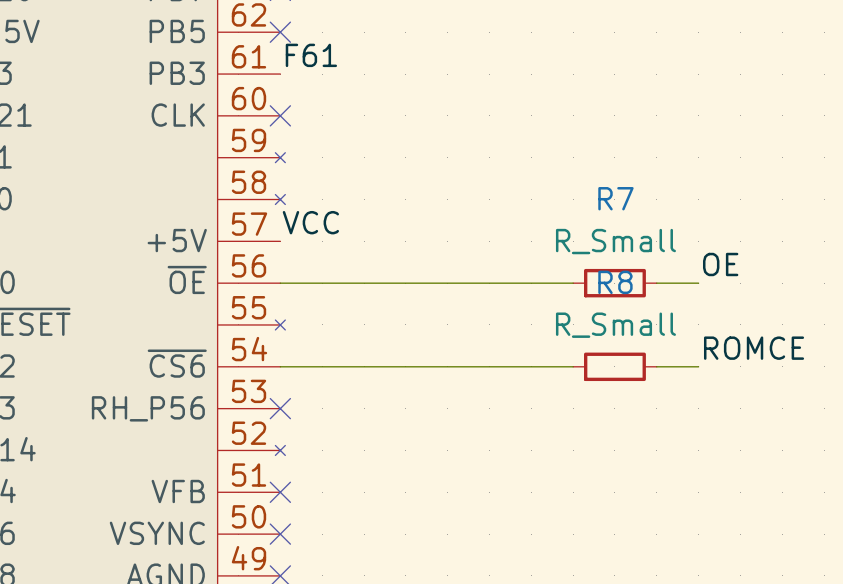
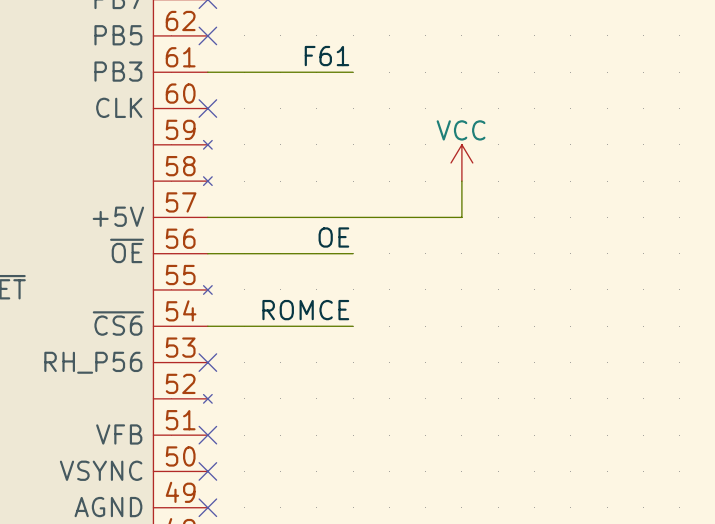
label position: F61 (311, 55) -> F61 (326, 56)
wire: none -> (207, 72) (353, 72)
power symbol: none -> VCC (461, 162)
wire: none -> (461, 181) (461, 217) (207, 217)
label: VCC (310, 222) -> none
label position: OE (720, 264) -> OE (333, 237)
wire: (447, 283) (573, 283) -> none
R7: R_Small (614, 283) -> none
wire: (656, 283) (698, 283) -> none
label position: ROMCE (754, 348) -> ROMCE (305, 310)
wire: (447, 366) (573, 366) -> none
R8: R_Small (614, 366) -> none
wire: (656, 366) (698, 366) -> none

